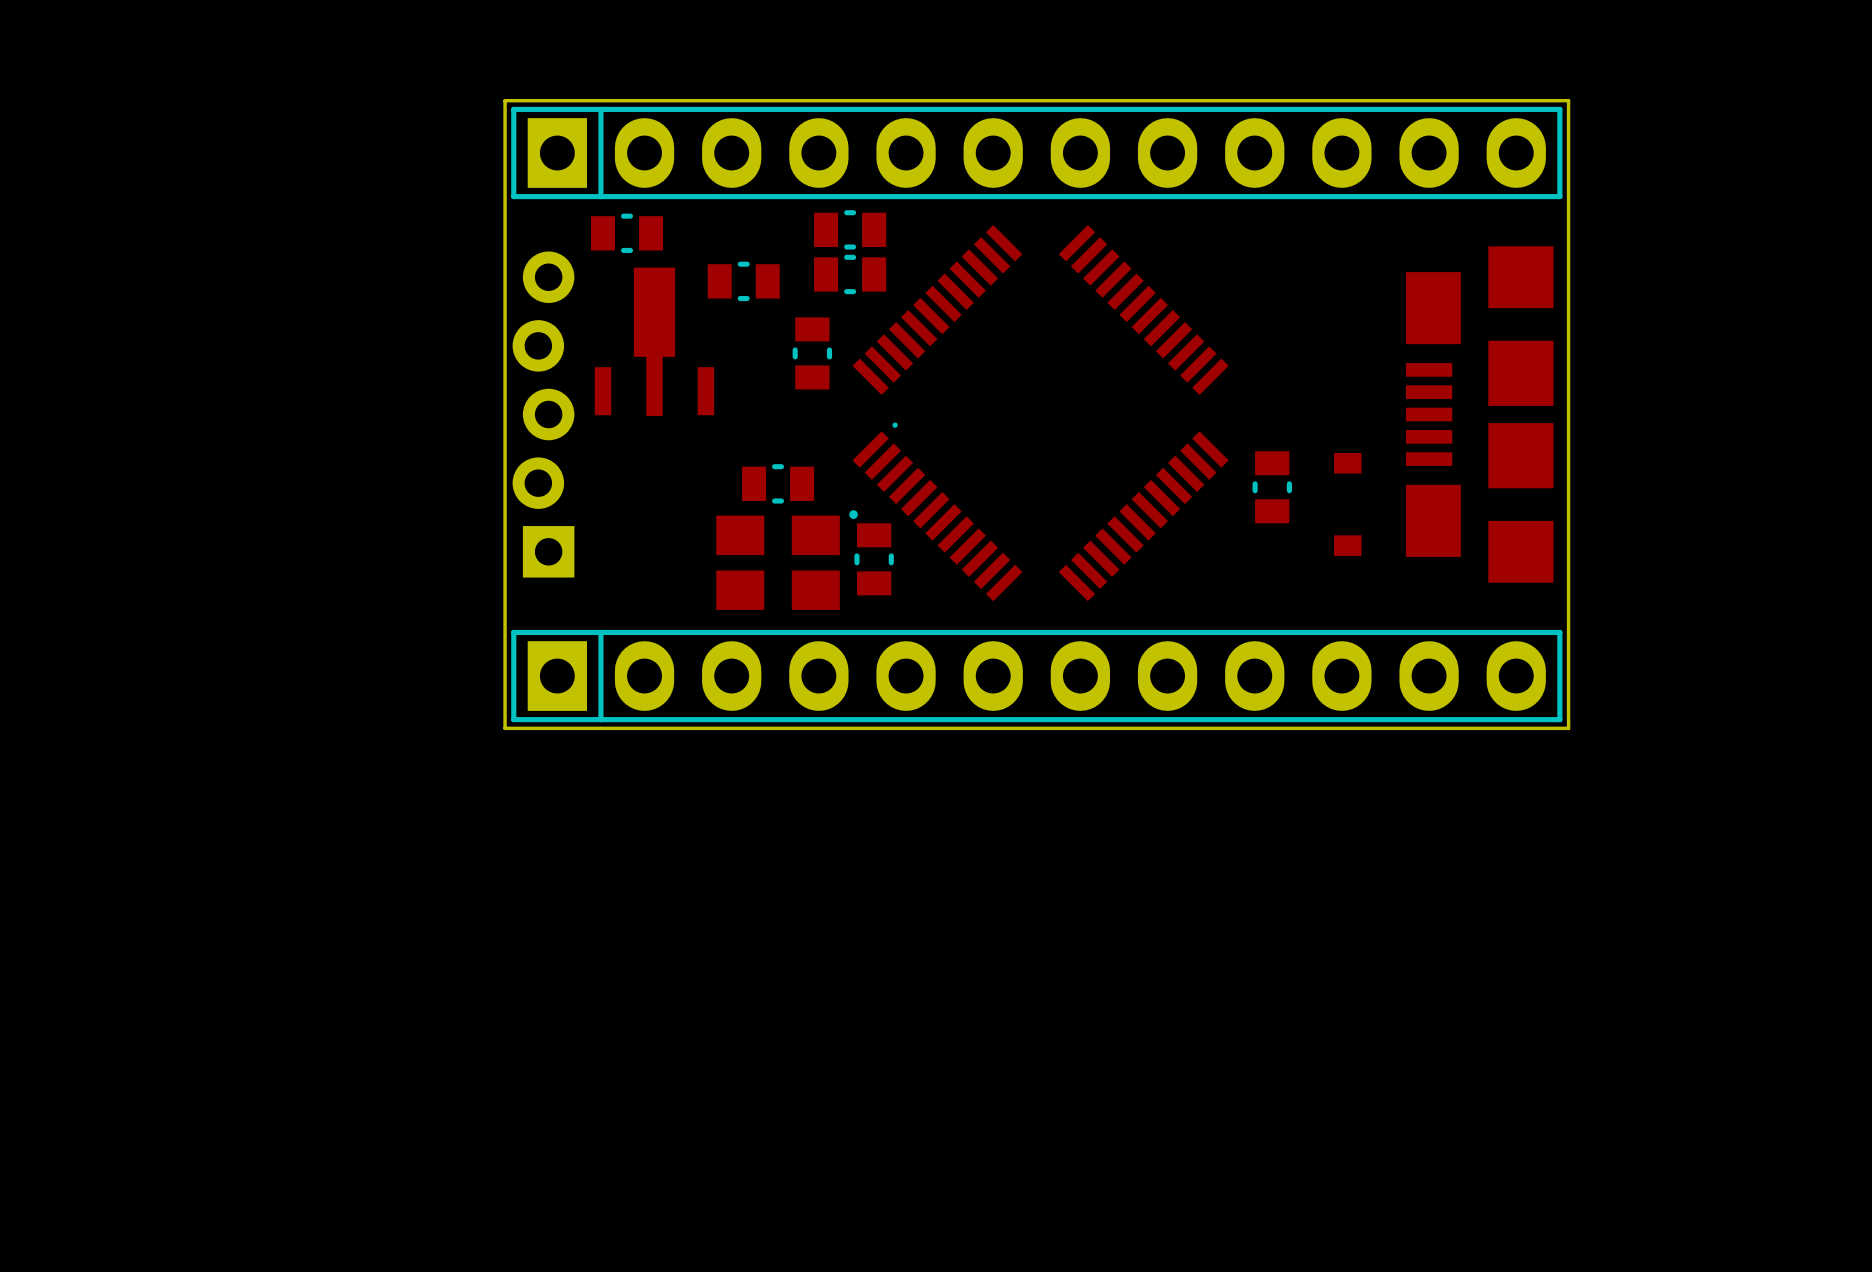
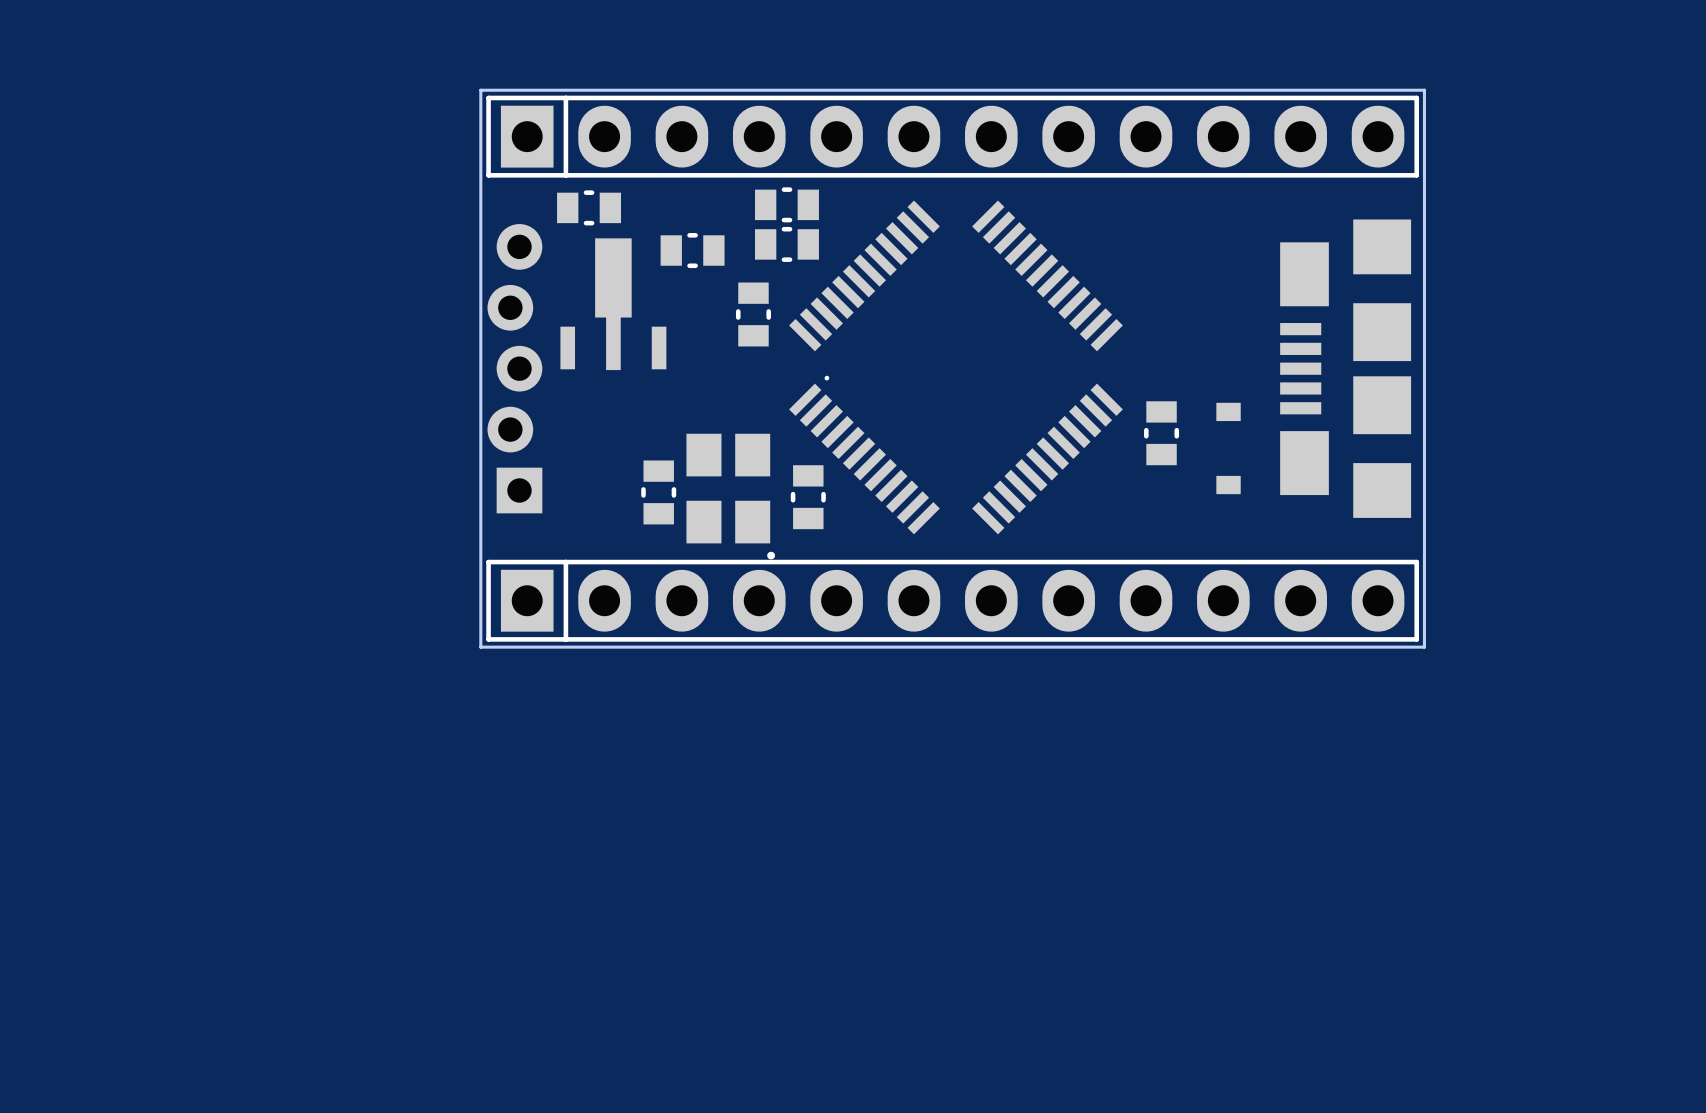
part rotation: 0° (778, 483) -> 90° clockwise (658, 492)
part position: (778, 483) -> (658, 492)
part rotation: 0° (787, 560) -> 90° clockwise (730, 496)

